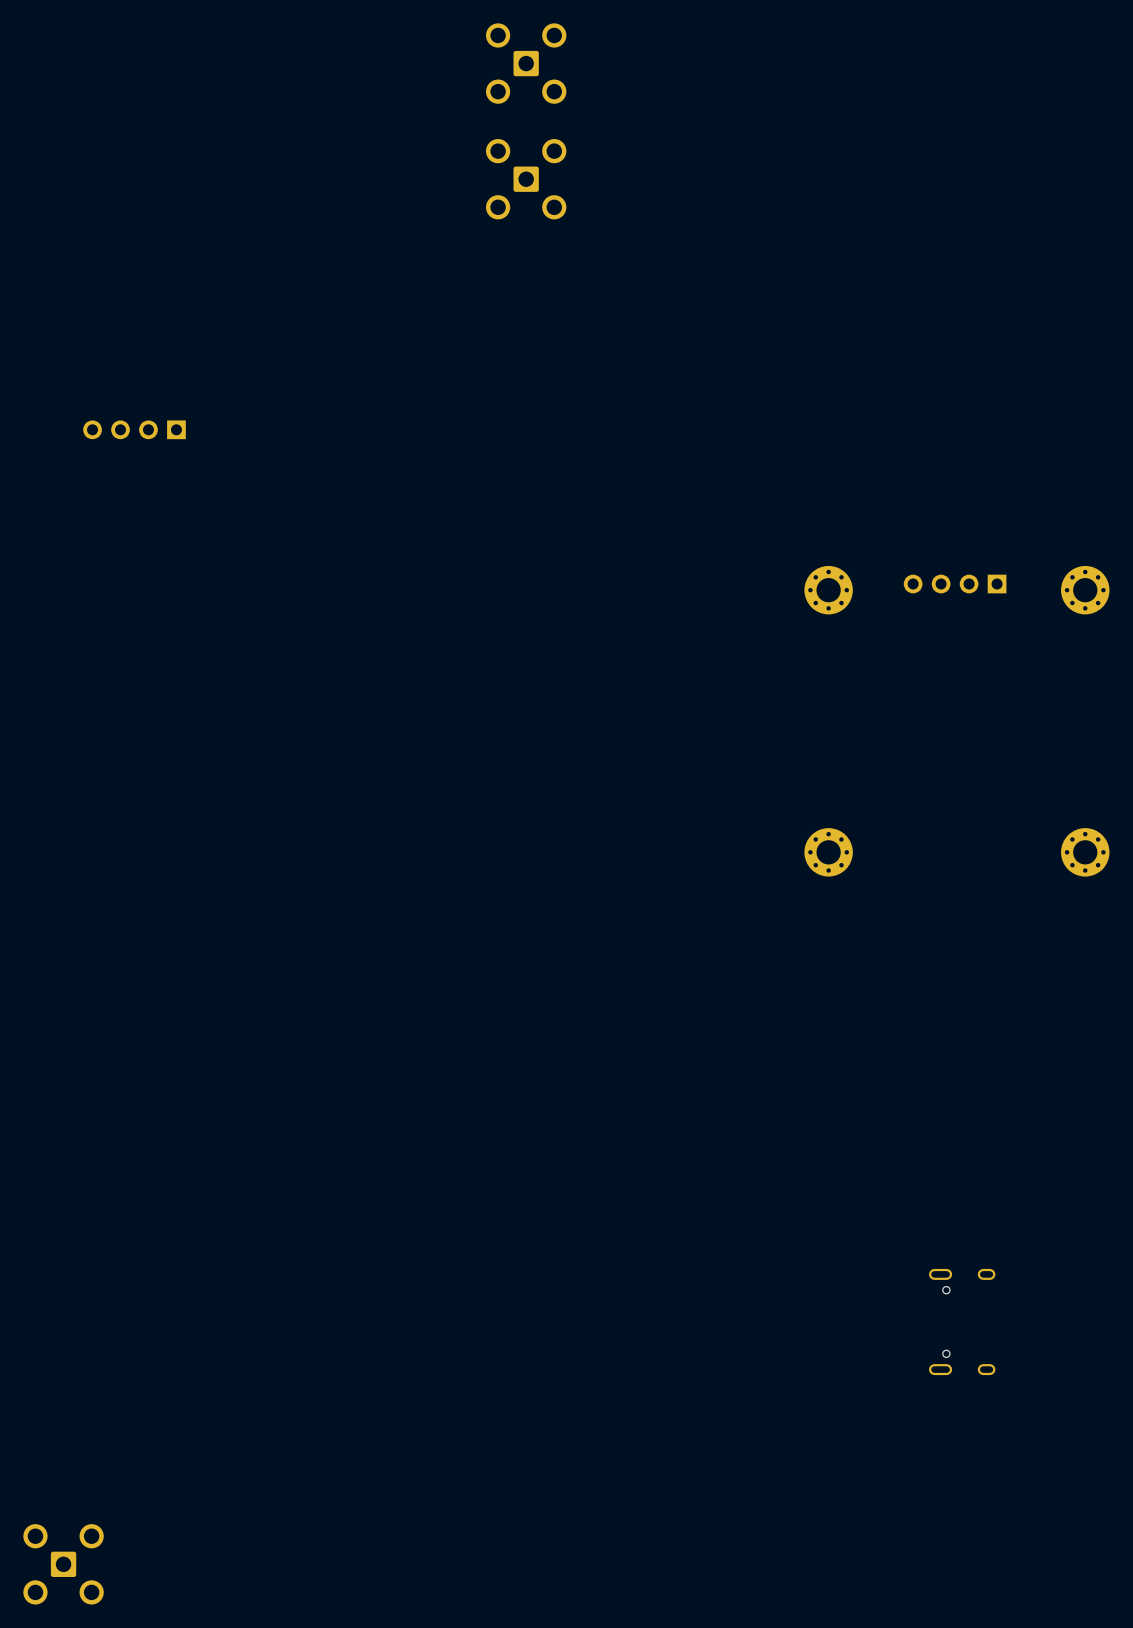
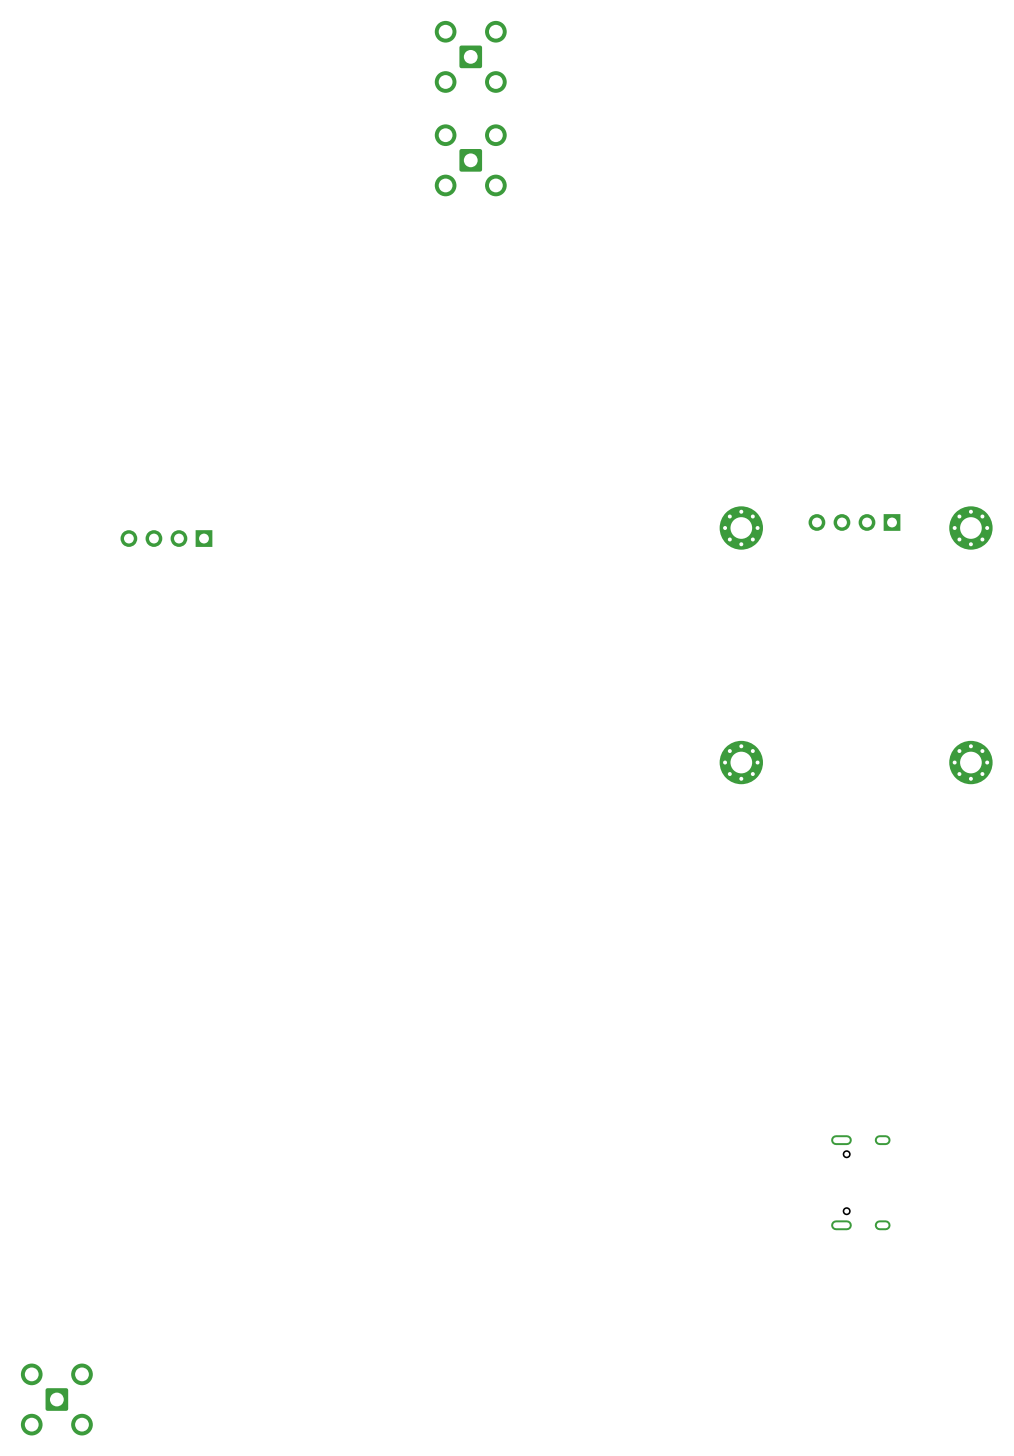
part position: (134, 429) -> (166, 538)

